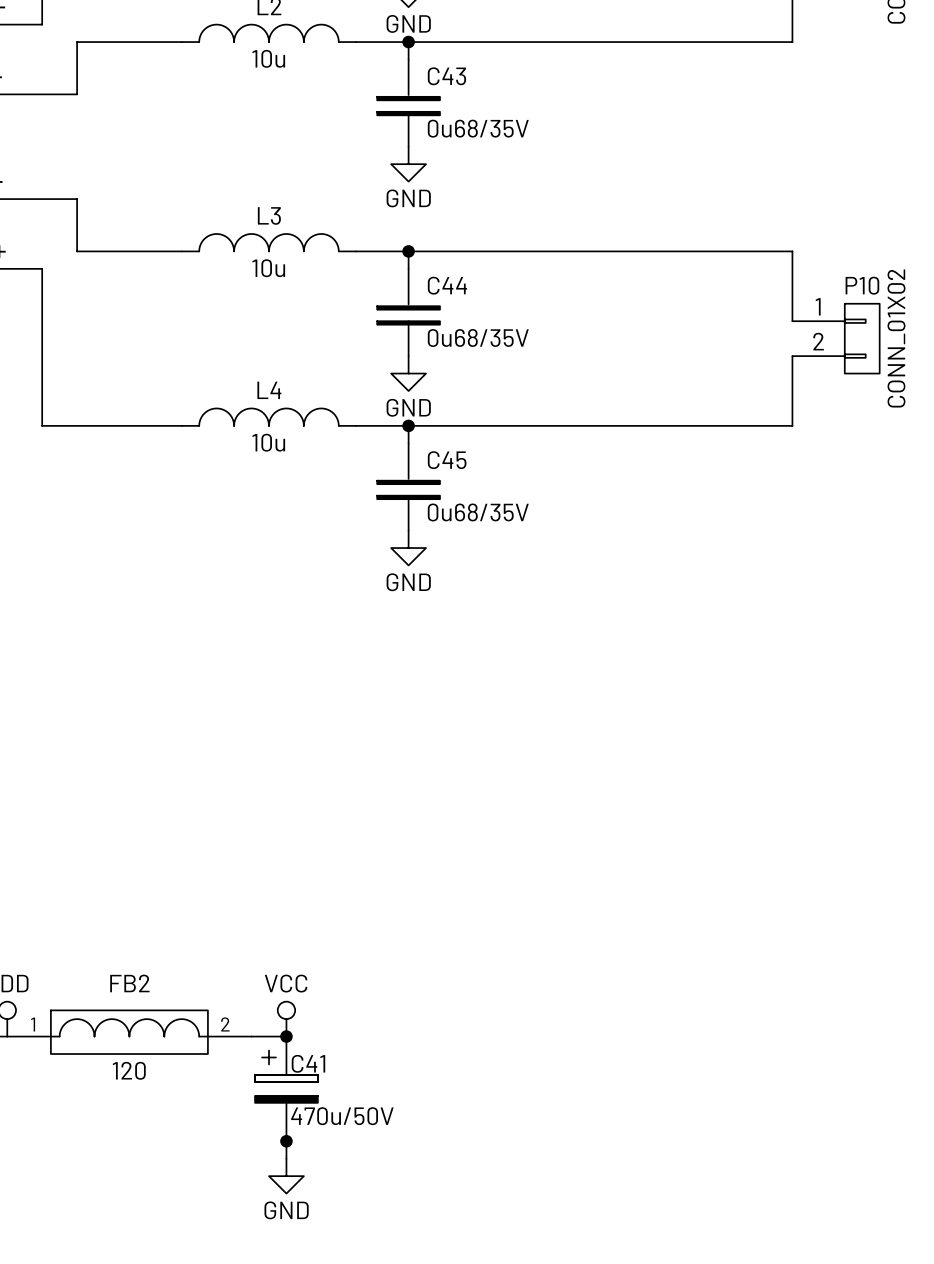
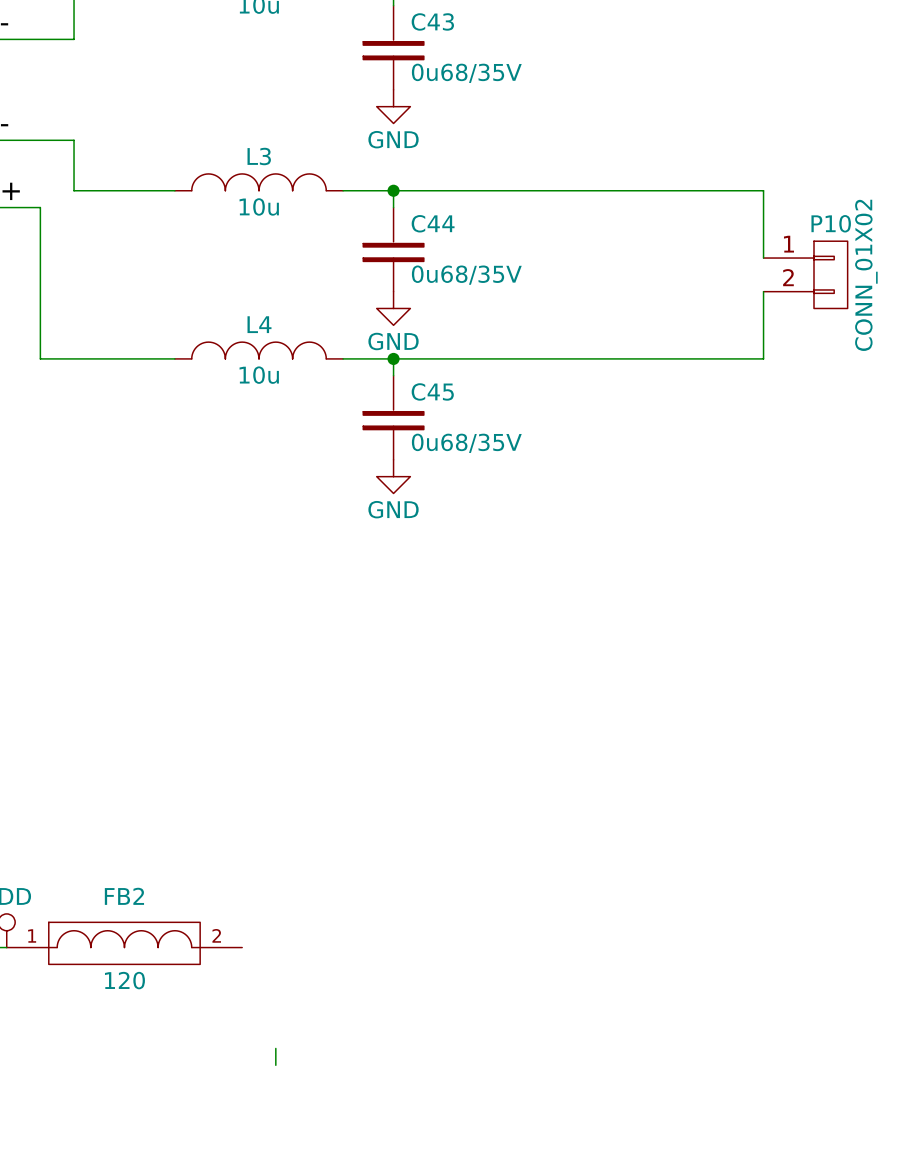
power symbol: VCC (286, 1019) -> none
wire: (251, 1036) (286, 1036) -> none
junction: (286, 1036) -> none
C41: 470u/50V (286, 1088) -> none
junction: (286, 1141) -> none
power symbol: GND (286, 1176) -> none

